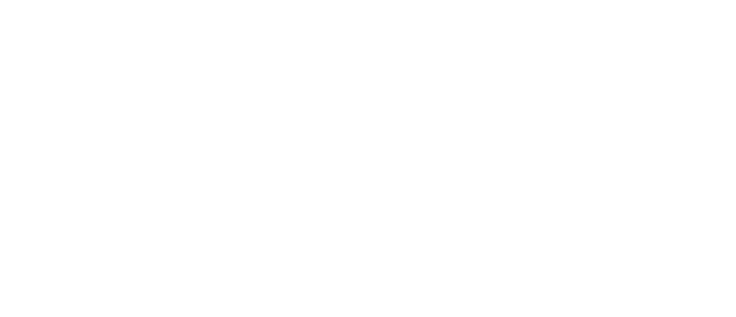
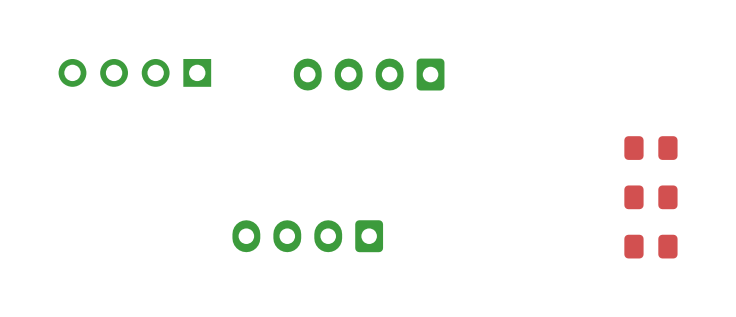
part: none -> (134, 72)
part: none -> (369, 74)
part: none -> (650, 148)
part: none -> (650, 197)
part: none -> (307, 236)
part: none -> (650, 246)

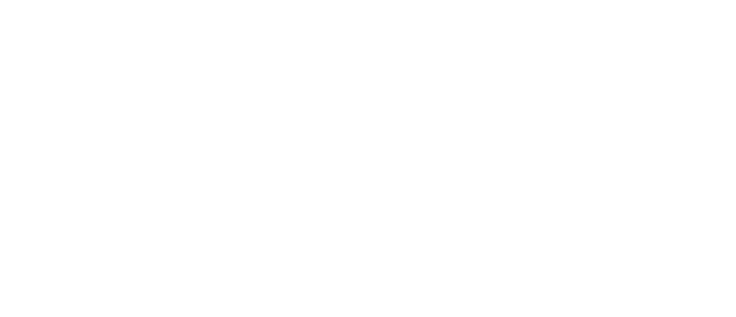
part: (134, 72) -> none
part: (369, 74) -> none
part: (650, 148) -> none
part: (650, 197) -> none
part: (307, 236) -> none
part: (650, 246) -> none

